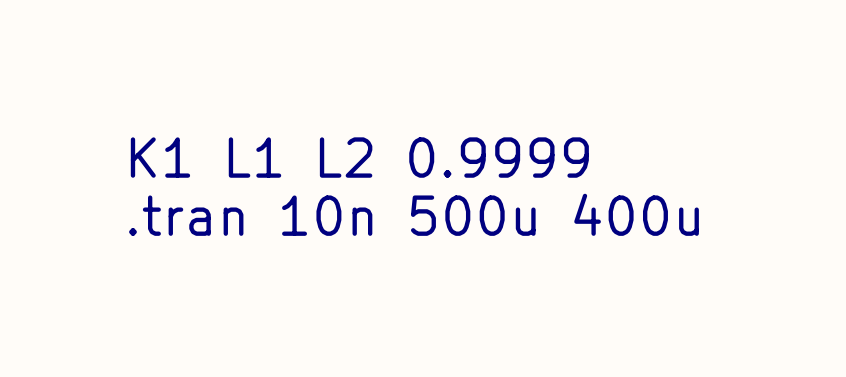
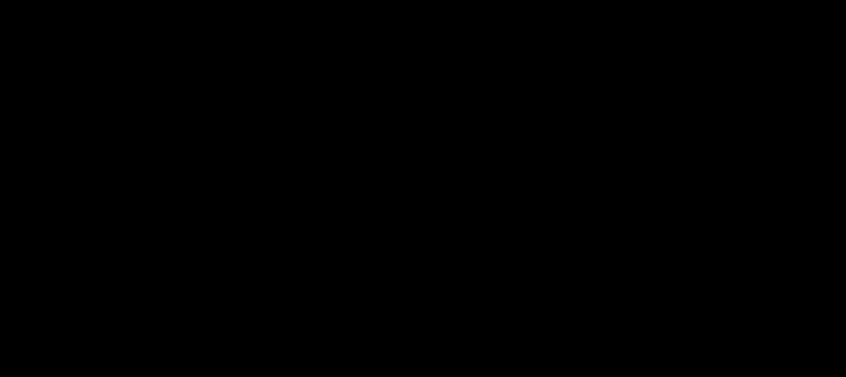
text: K1 L1 L2 0.9999 (359, 157) -> none
text: .tran 10n 500u 400u (413, 214) -> none

